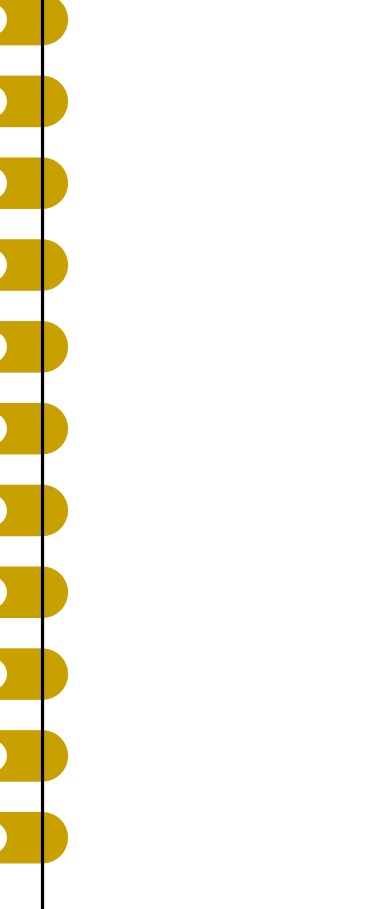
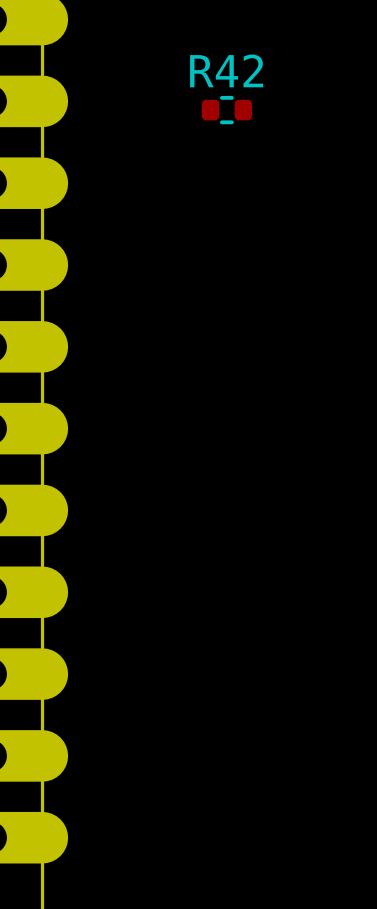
R42: none -> (226, 110)

